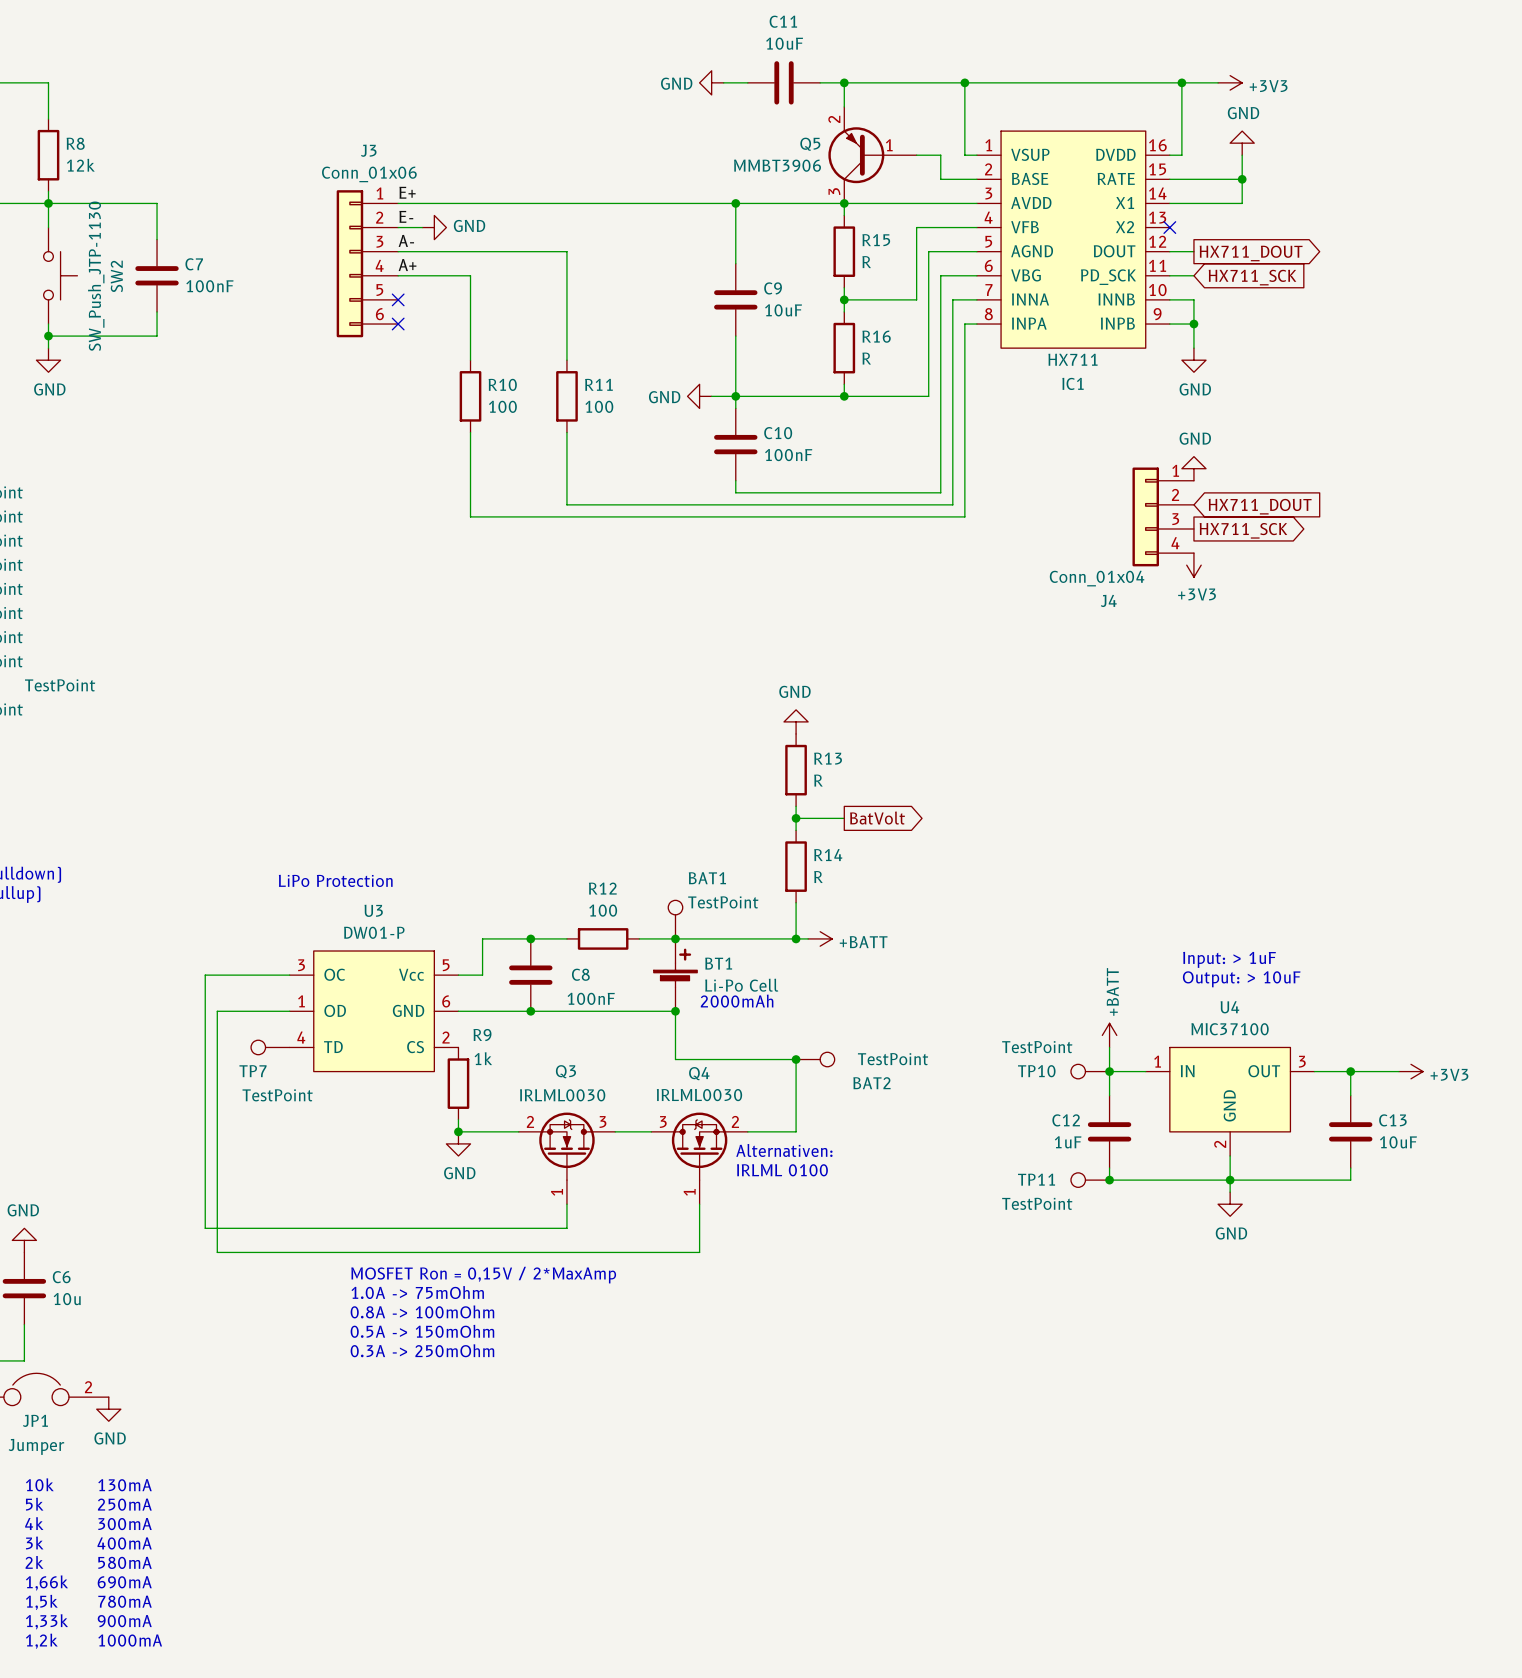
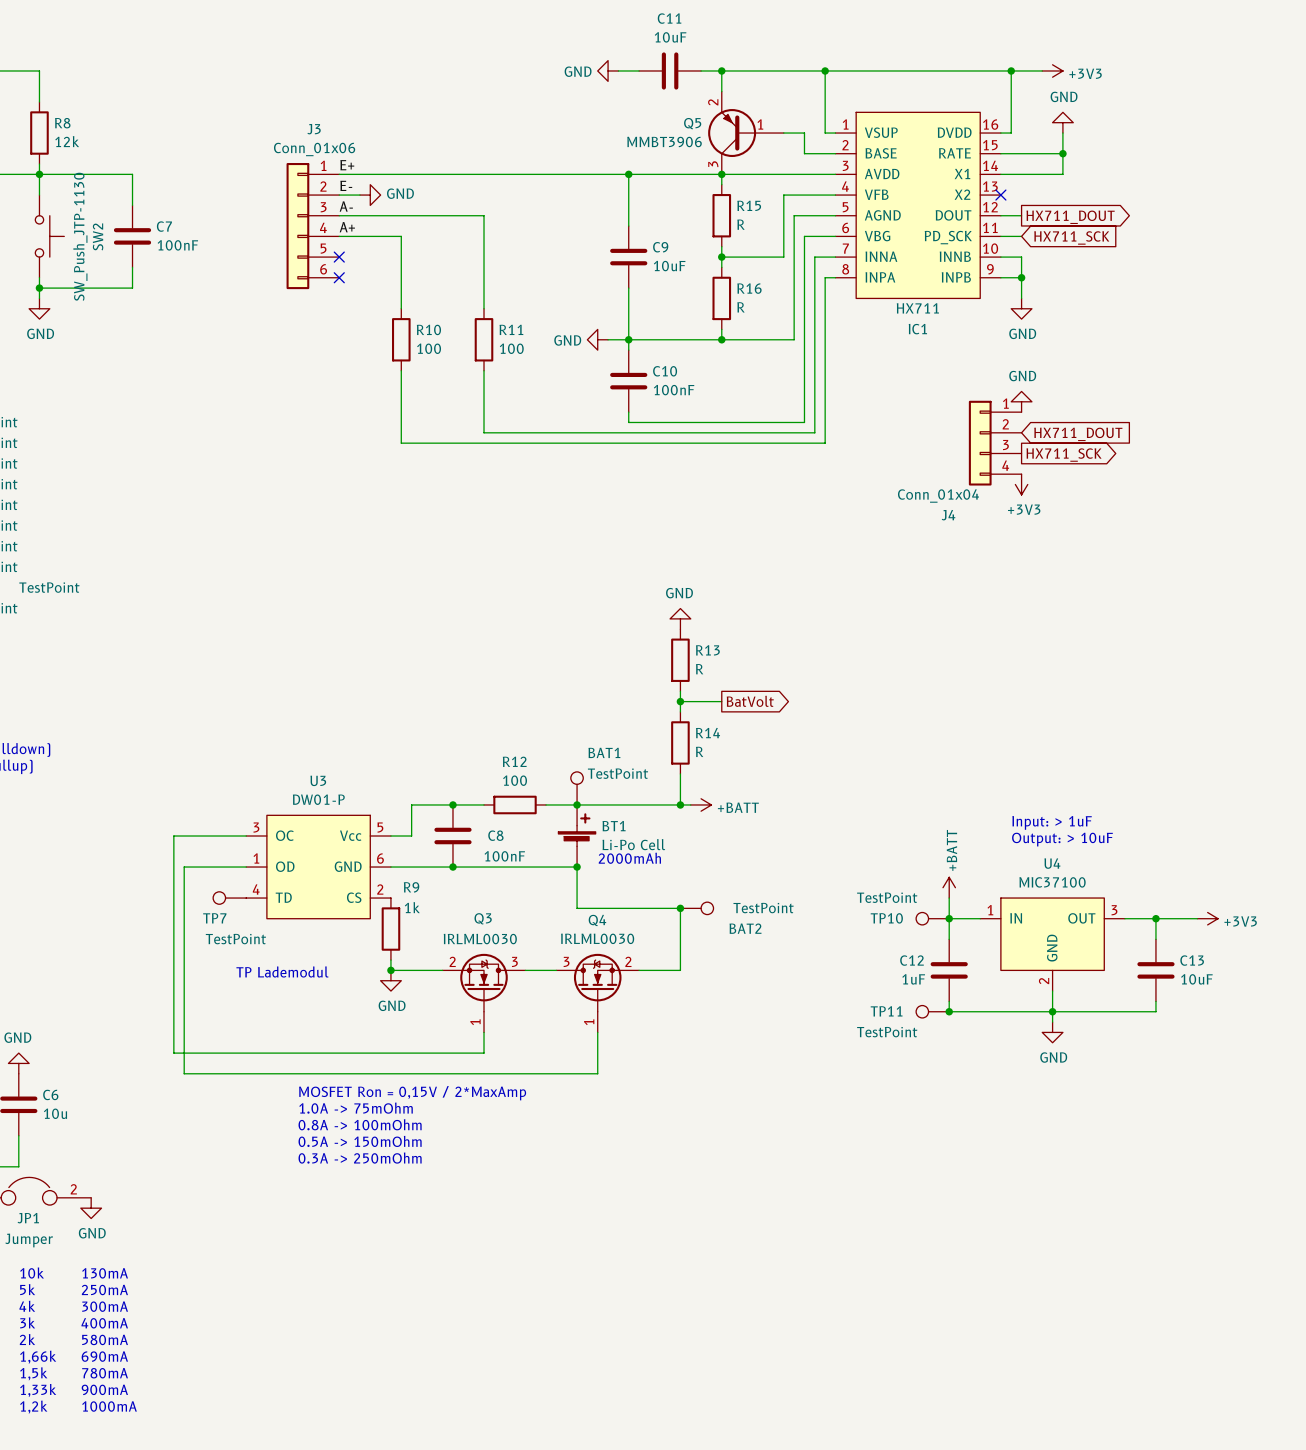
text: LiPo Protection (335, 880) -> none
text: none -> TP Lademodul (282, 971)
text: Alternativen: (784, 1150) -> none
text: IRLML 0100 (782, 1170) -> none

